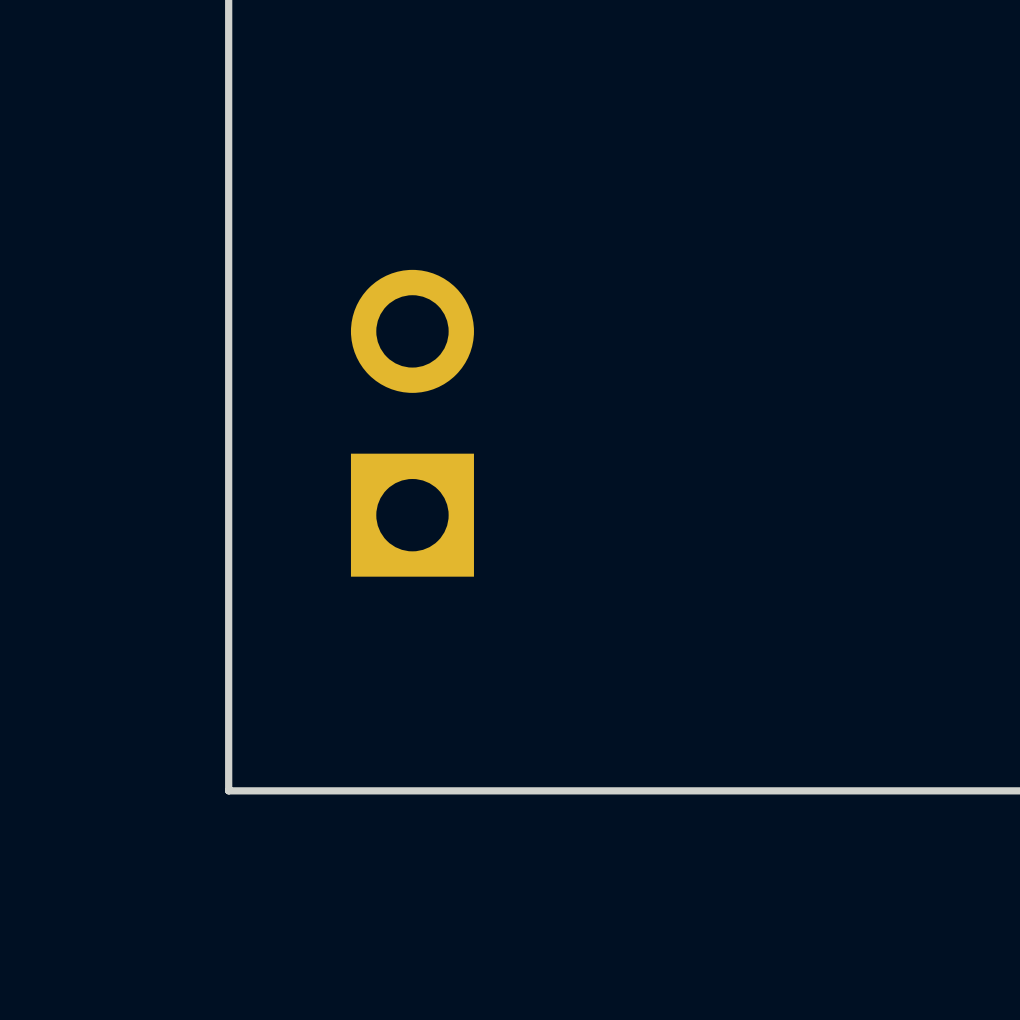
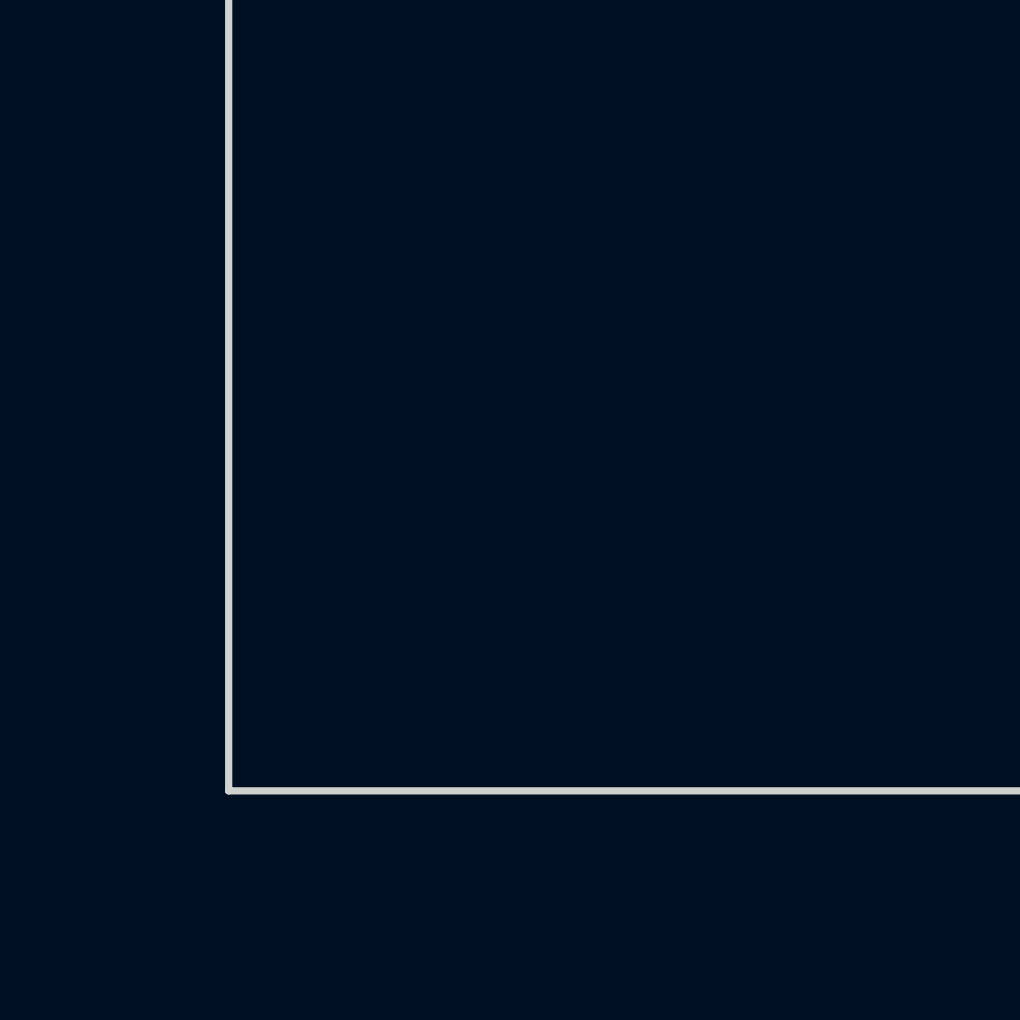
part: (412, 423) -> none

